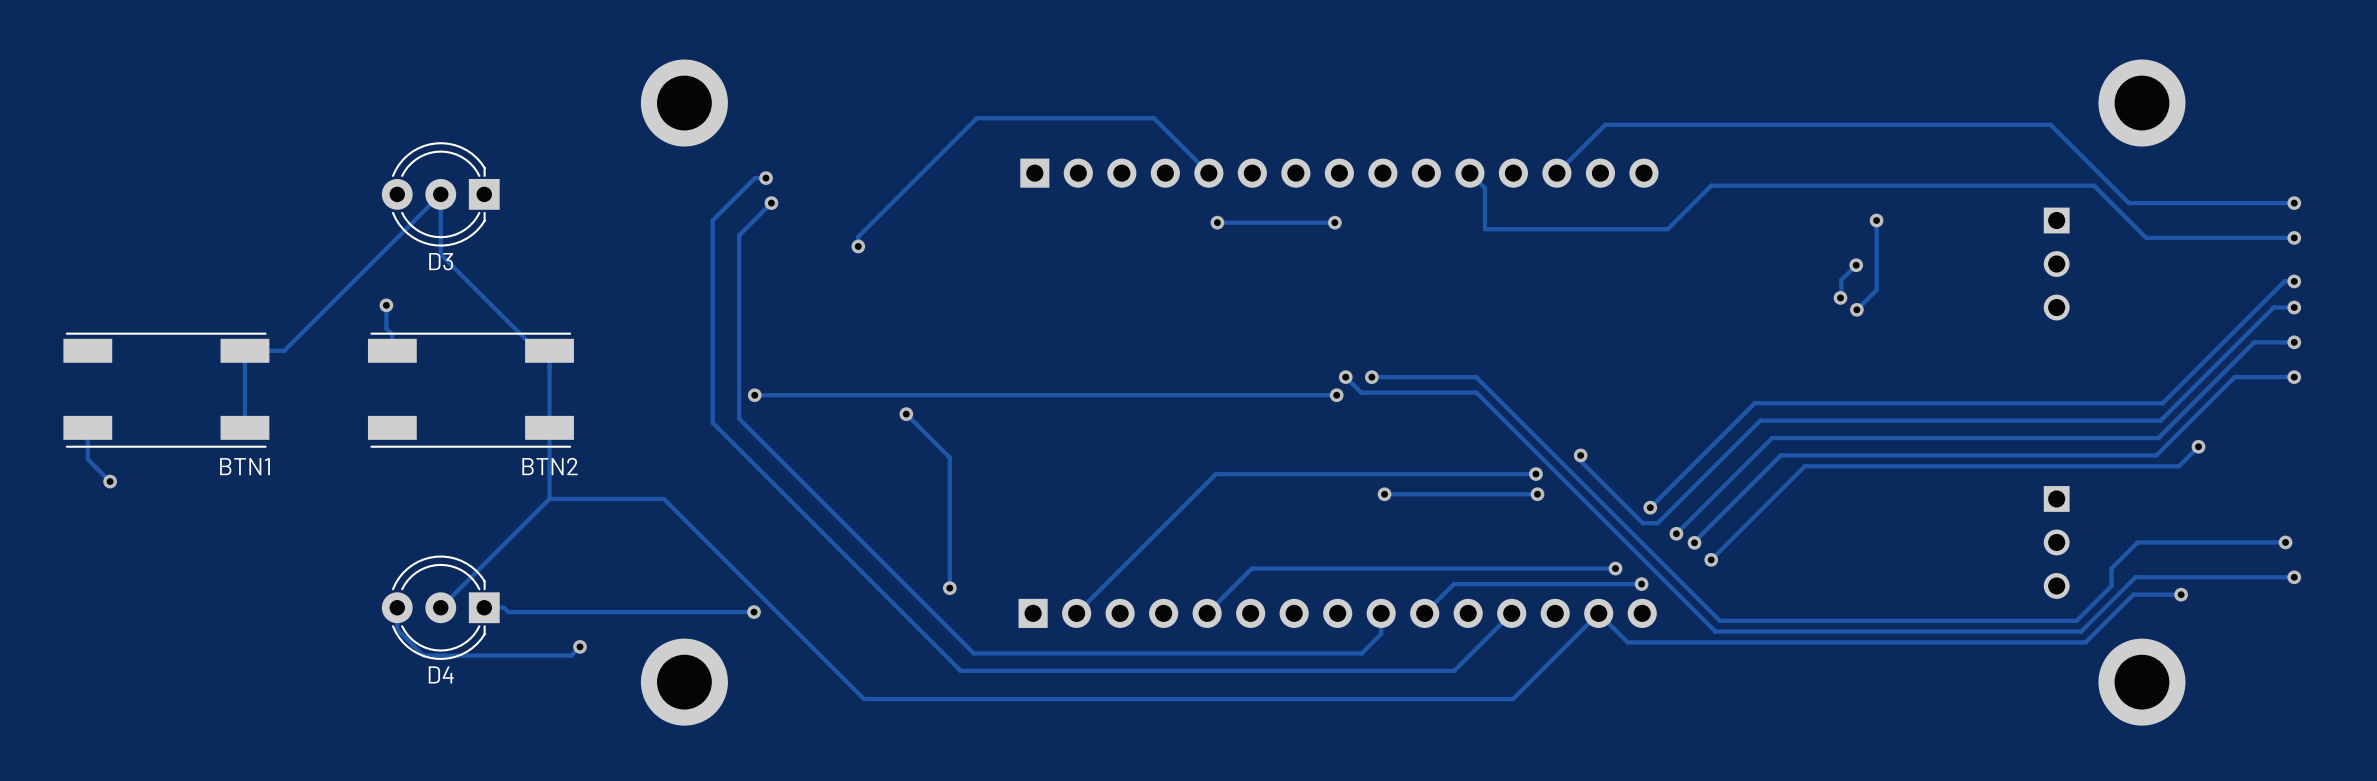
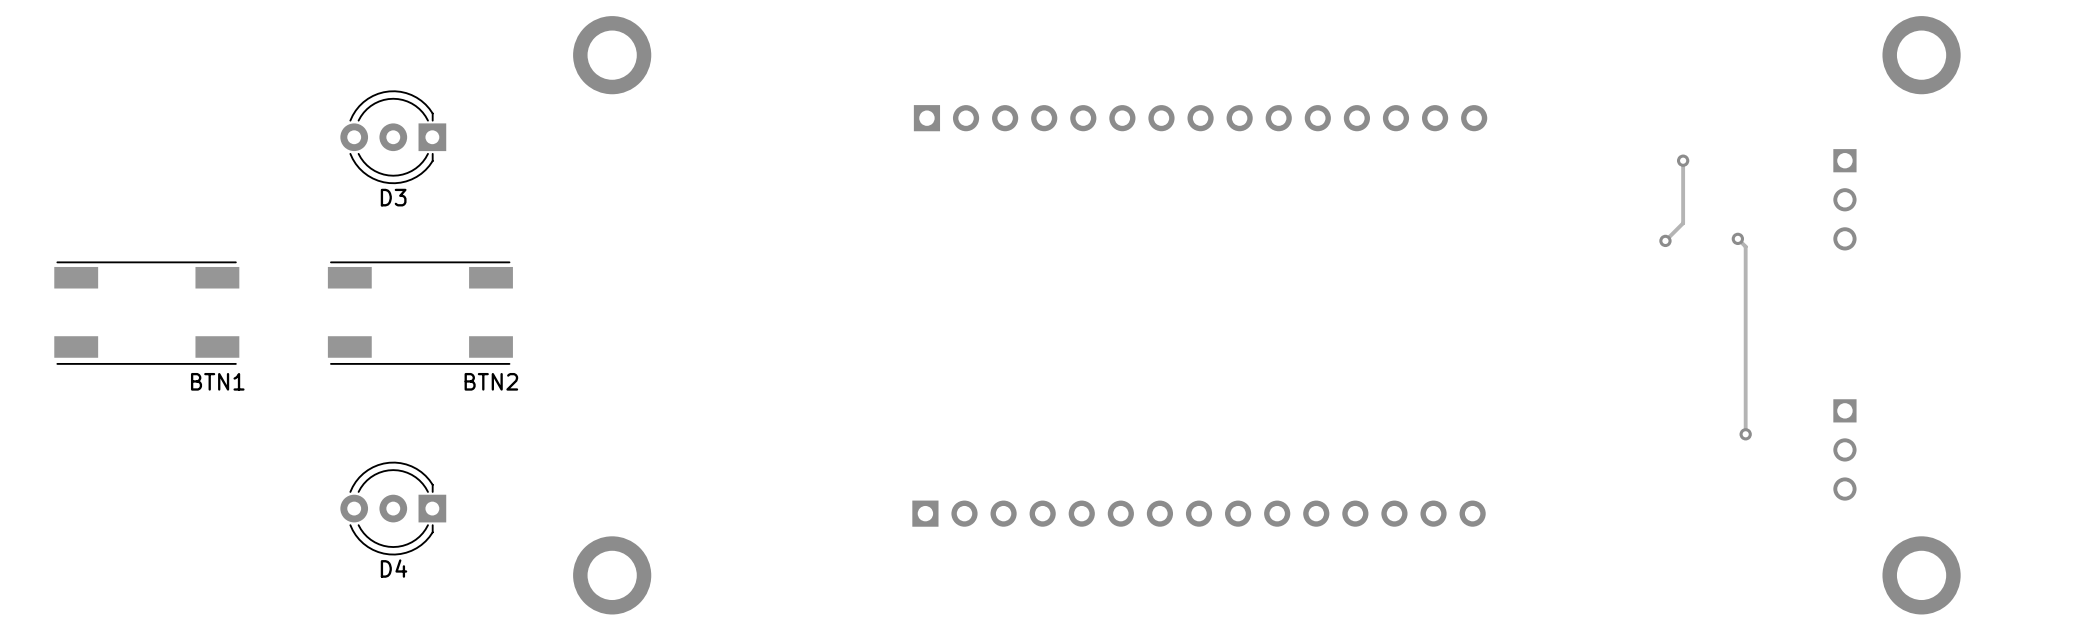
track: (1208, 173) (1153, 118) (976, 118) (858, 236) (858, 246) -> none
track: (1469, 173) (1484, 188) (1484, 229) (1667, 229) (1711, 185) (2094, 185) (2146, 237) (2294, 237) -> none
track: (1556, 173) (1605, 124) (2050, 124) (2128, 203) (2294, 203) -> none
track: (766, 178) (755, 178) (712, 220) (712, 422) (960, 670) (1454, 670) (1511, 613) -> none
via: (766, 178) -> none
track: (771, 203) (739, 235) (739, 418) (973, 653) (1361, 653) (1381, 633) (1381, 613) -> none
via: (771, 203) -> none
via: (2294, 203) -> none
via: (1217, 222) -> none
track: (1334, 222) (1217, 222) -> none
via: (1334, 222) -> none
via: (2294, 237) -> none
via: (858, 246) -> none
track: (1856, 265) (1841, 280) (1840, 297) -> none
via: (1856, 265) -> none
track: (2294, 281) (2284, 281) (2162, 403) (1754, 403) (1650, 507) -> none
via: (2294, 281) -> none
via: (1840, 297) -> none
track: (386, 305) (386, 328) (392, 334) (392, 350) -> none
via: (386, 305) -> none
track: none -> (1737, 238) (1745, 246) (1745, 434)
via: none -> (1737, 238)
track: (2294, 307) (2273, 307) (2160, 420) (1760, 420) (1657, 523) (1642, 523) (1580, 461) (1580, 455) -> none
via: (2294, 307) -> none
track: (2294, 342) (2254, 342) (2158, 438) (1772, 438) (1676, 533) -> none
via: (2294, 342) -> none
track: (1345, 377) (1361, 392) (1476, 392) (1715, 631) (2081, 631) (2135, 577) (2294, 577) -> none
via: (1345, 377) -> none
track: (1371, 377) (1476, 377) (1719, 620) (2076, 620) (2111, 585) (2111, 568) (2137, 542) (2285, 542) -> none
via: (1371, 377) -> none
track: (2294, 377) (2234, 377) (2156, 455) (1780, 455) (1694, 542) -> none
via: (2294, 377) -> none
via: (754, 395) -> none
track: (1336, 395) (754, 395) -> none
via: (1336, 395) -> none
track: (906, 414) (949, 457) (949, 588) -> none
via: (906, 414) -> none
track: (87, 427) (87, 459) (110, 481) -> none
track: (244, 427) (244, 350) (284, 350) (440, 194) (440, 254) (537, 350) (549, 350) (549, 498) -> none
track: (2198, 446) (2179, 466) (1804, 466) (1711, 559) -> none
via: (2198, 446) -> none
via: (1580, 455) -> none
track: (1535, 474) (1215, 474) (1076, 613) -> none
via: (1535, 474) -> none
via: (110, 481) -> none
via: (1384, 494) -> none
track: (1537, 494) (1384, 494) -> none
via: (1537, 494) -> none
track: (549, 498) (440, 607) -> none
track: (549, 498) (663, 498) (864, 699) (1513, 699) (1598, 613) (1627, 642) (2085, 642) (2133, 594) (2181, 594) -> none
via: (1650, 507) -> none
via: none -> (1745, 434)
via: (1676, 533) -> none
via: (1694, 542) -> none
via: (2285, 542) -> none
via: (1711, 559) -> none
track: (1615, 568) (1251, 568) (1207, 613) -> none
via: (1615, 568) -> none
via: (2294, 577) -> none
track: (1641, 584) (1453, 584) (1424, 613) -> none
via: (1641, 584) -> none
via: (949, 588) -> none
via: (2181, 594) -> none
track: (397, 607) (397, 629) (423, 655) (571, 655) (580, 646) -> none
track: (484, 607) (503, 607) (508, 612) (754, 612) -> none
via: (754, 612) -> none
via: (580, 646) -> none

